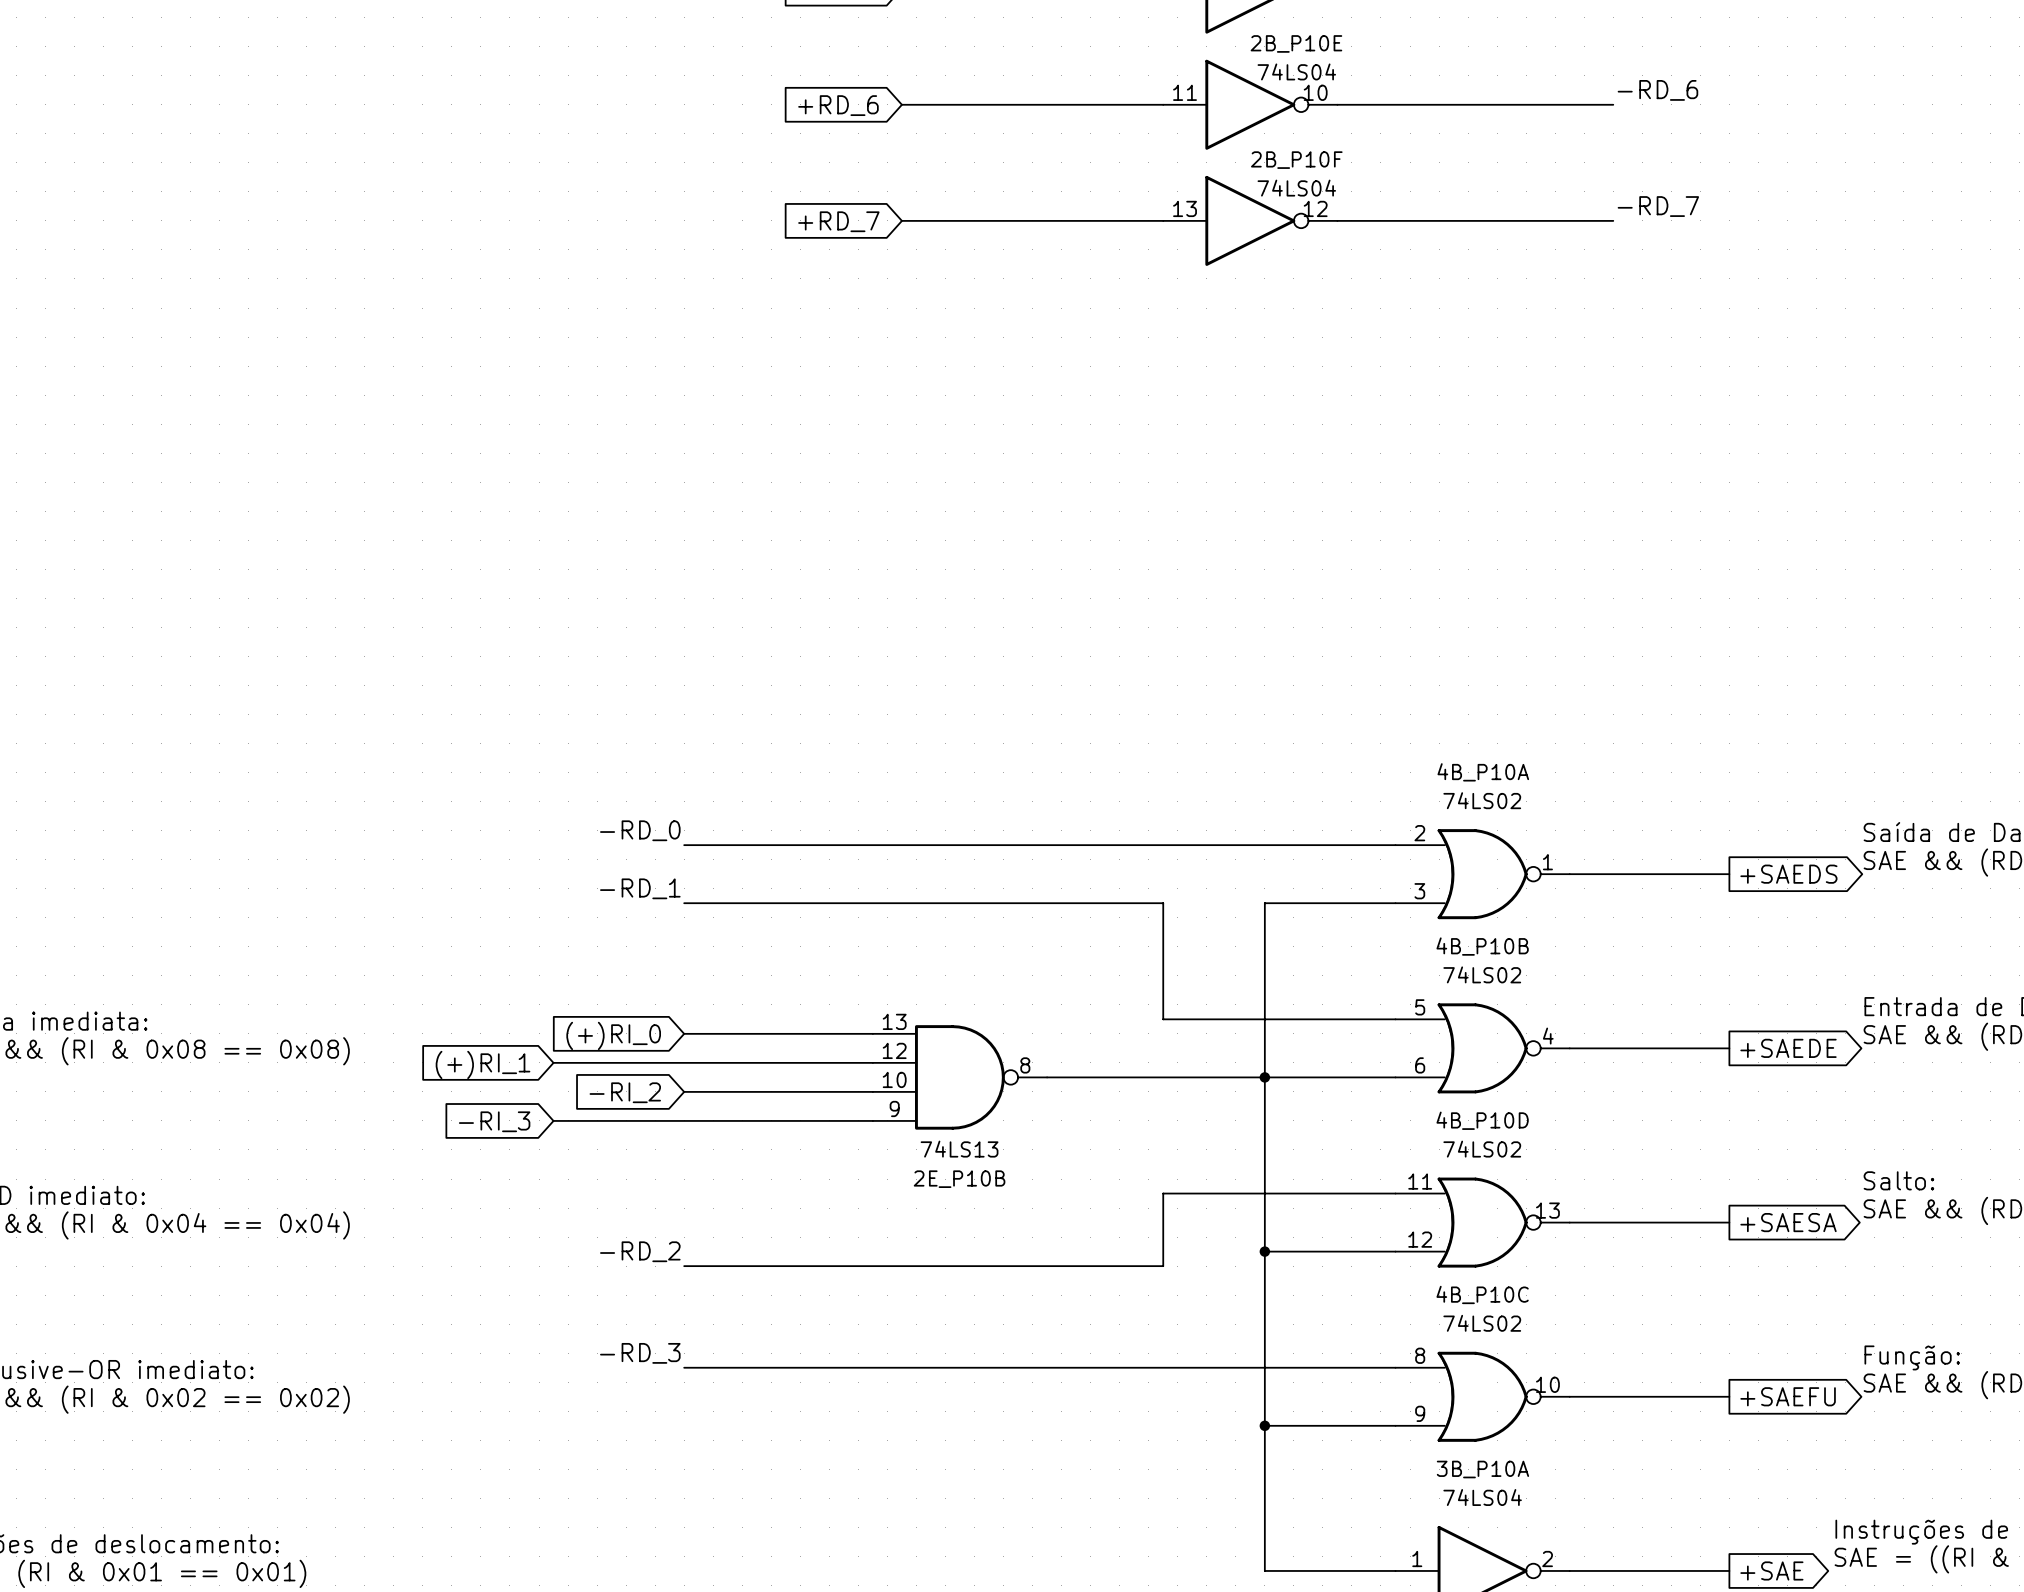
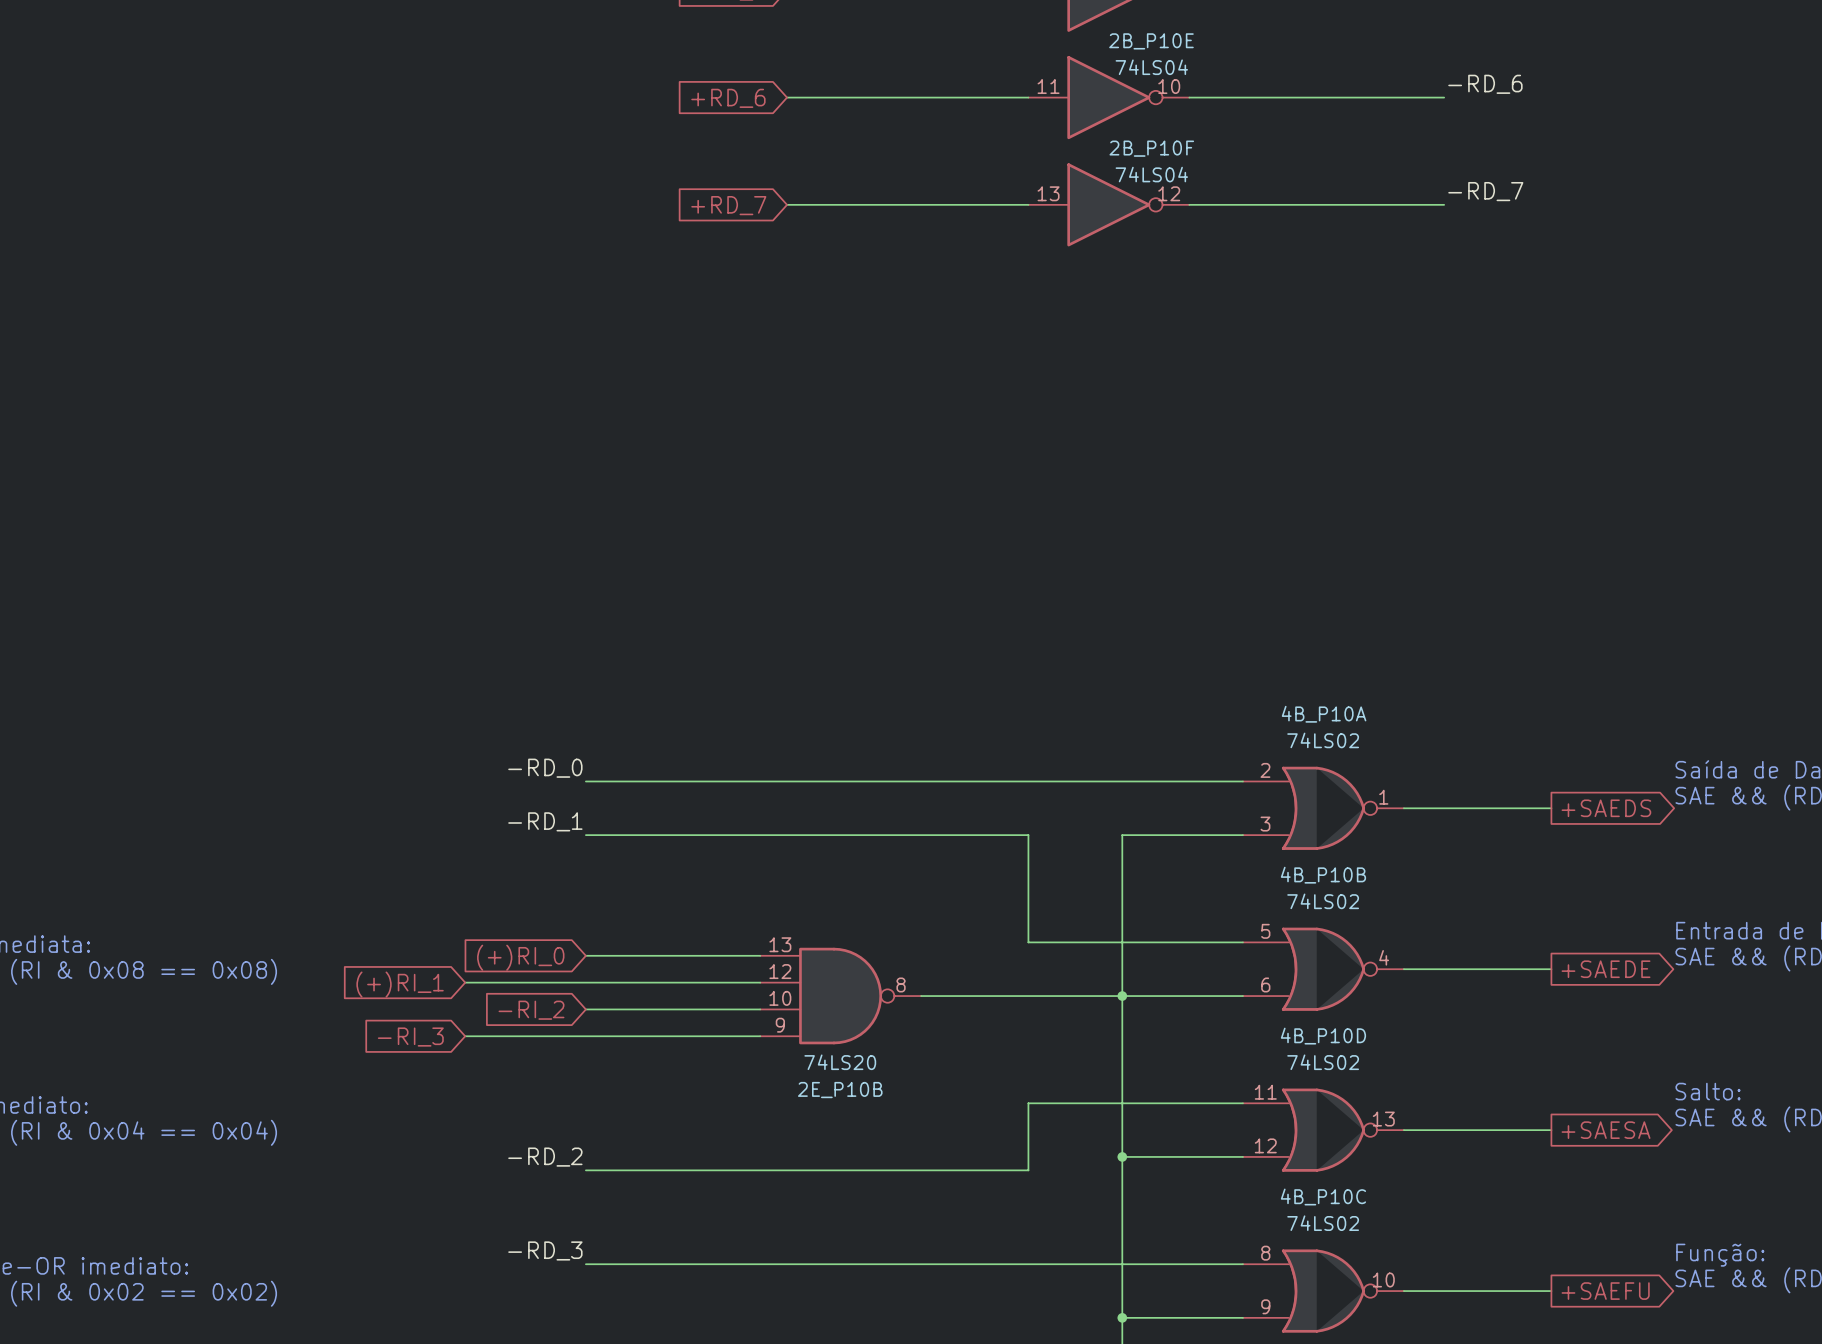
2E_P10B value: 74LS13 (959, 1149) -> 74LS20 (840, 1062)

